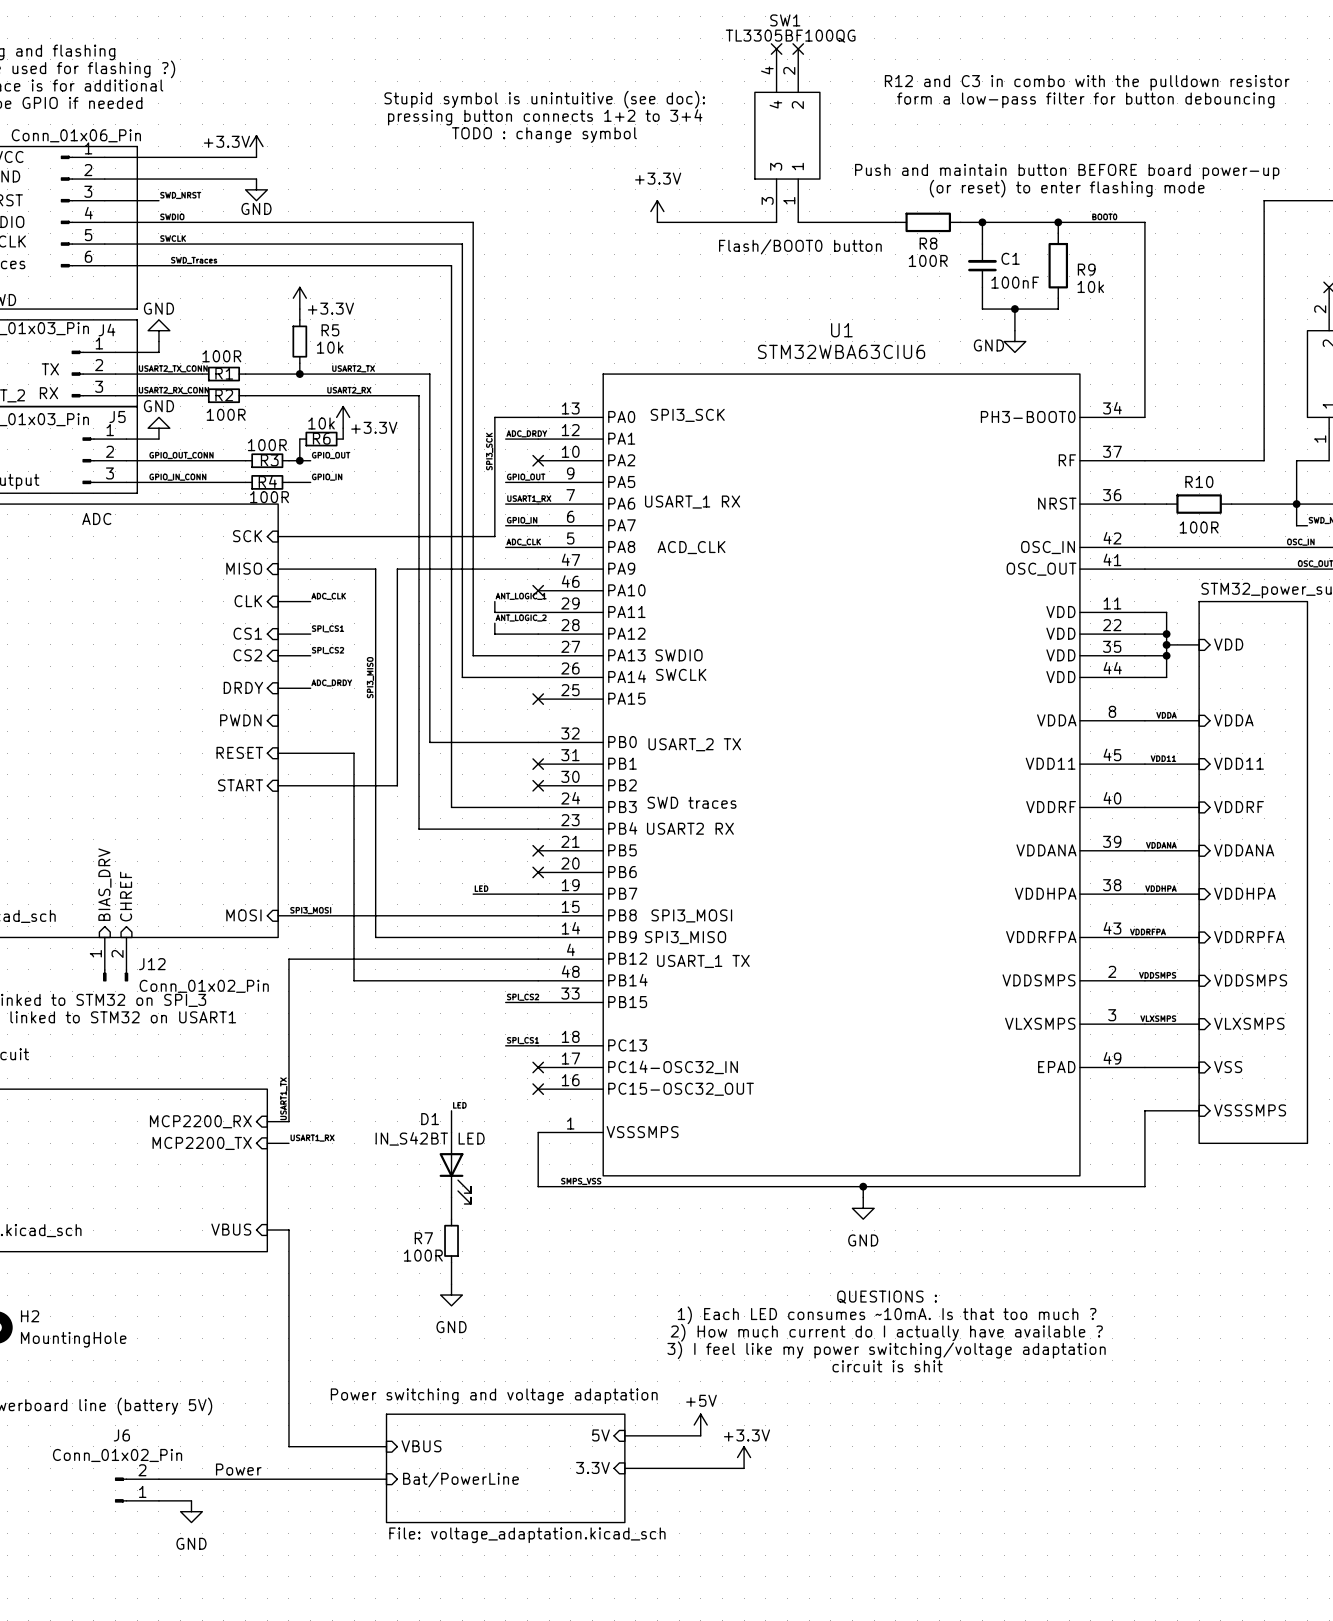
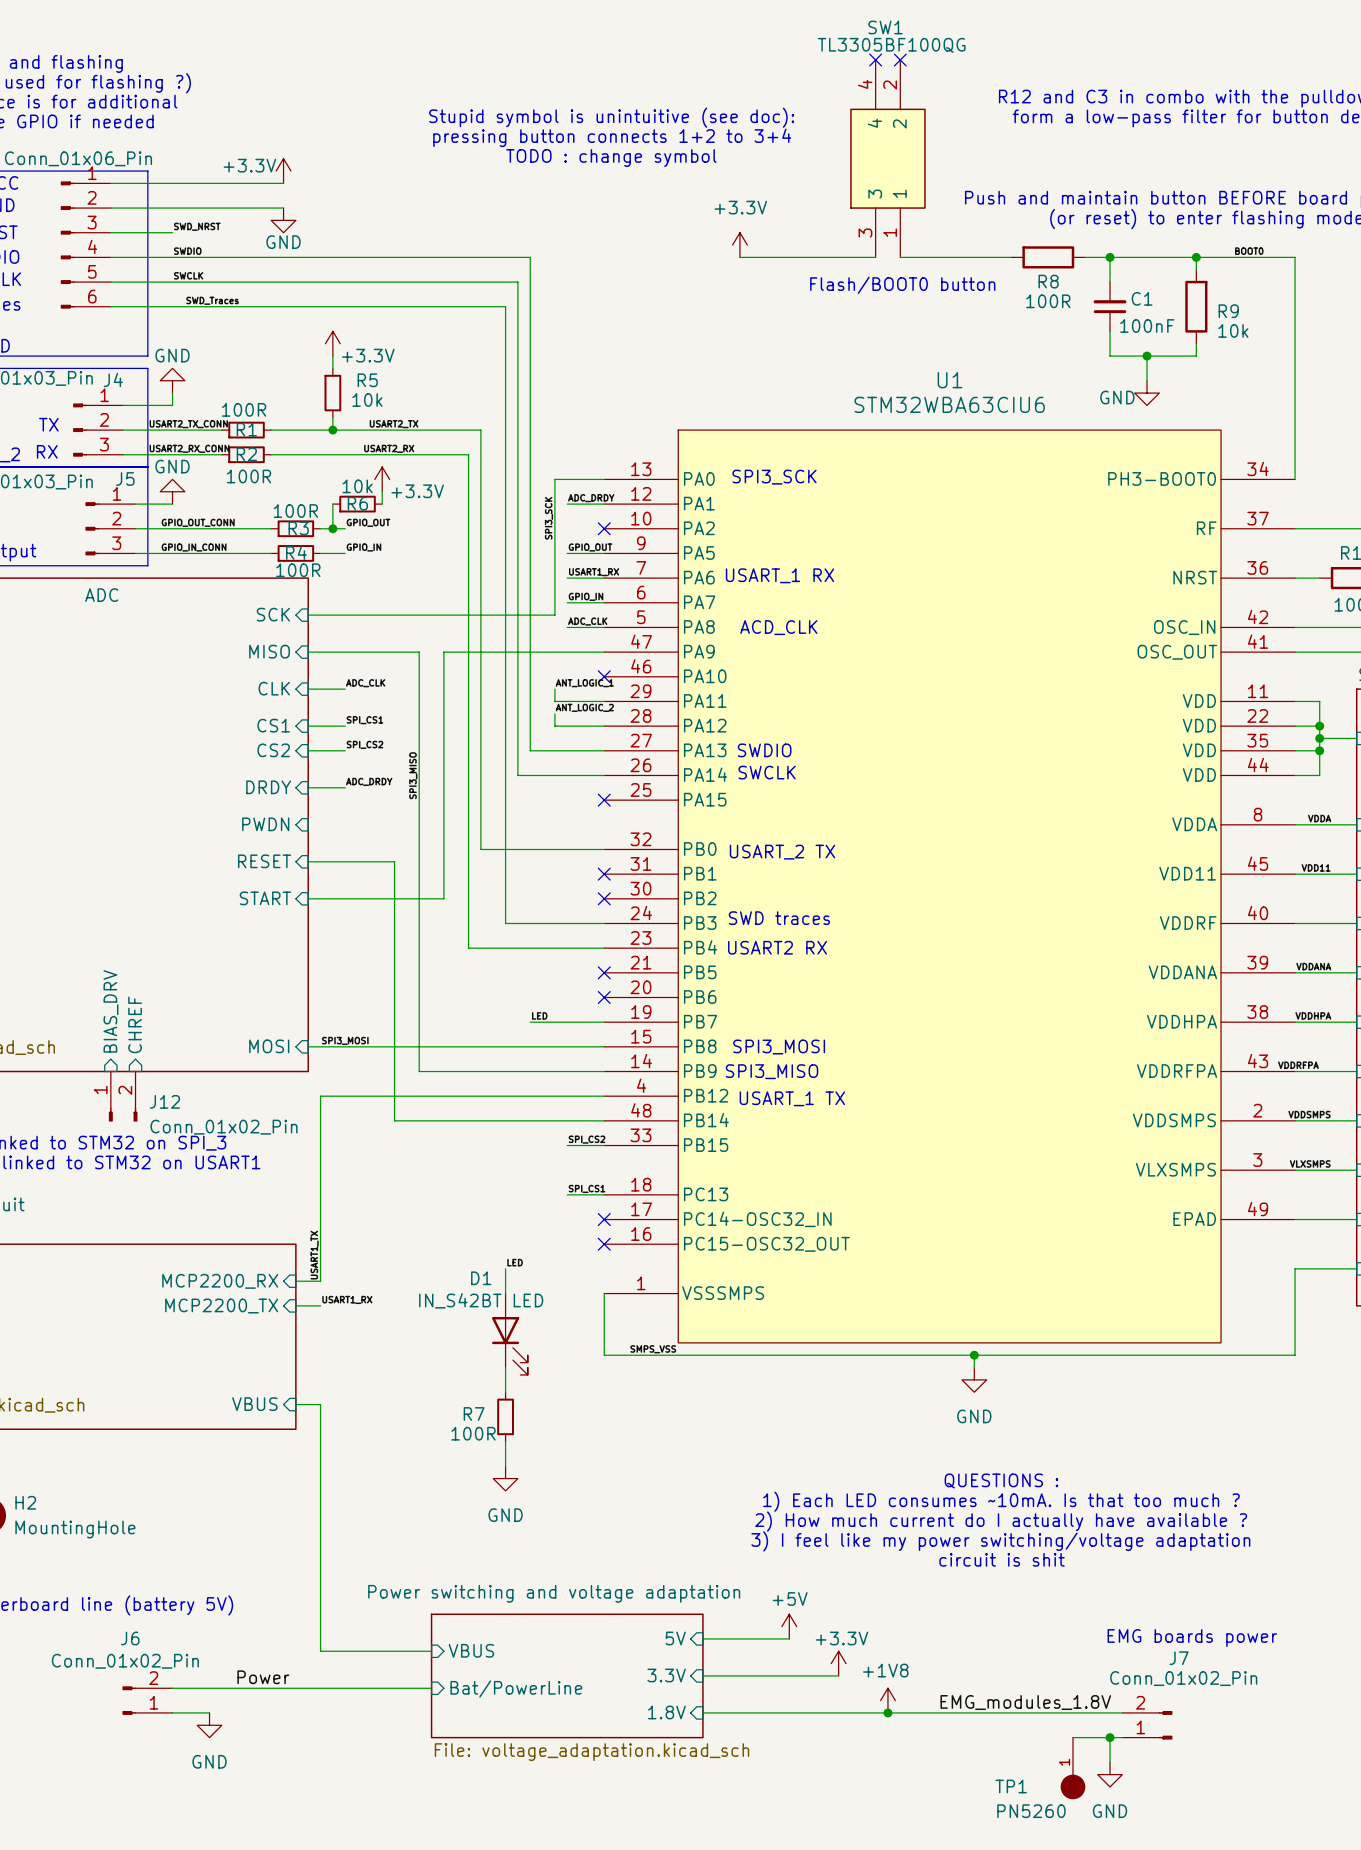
text: none -> EMG boards power (1192, 1638)
power symbol: none -> +1V8 (887, 1700)
label: none -> EMG_modules_1.8V (1025, 1702)
sheet pin: none -> 1.8V (666, 1712)
wire: none -> (702, 1712) (1122, 1712)
junction: none -> (887, 1712)
J7: none -> Conn_01x02_Pin (1147, 1725)
wire: none -> (1073, 1737) (1122, 1737)
wire: none -> (1110, 1737) (1110, 1762)
junction: none -> (1110, 1737)
TP1: none -> PN5260 (1073, 1768)
power symbol: none -> GND (1110, 1774)

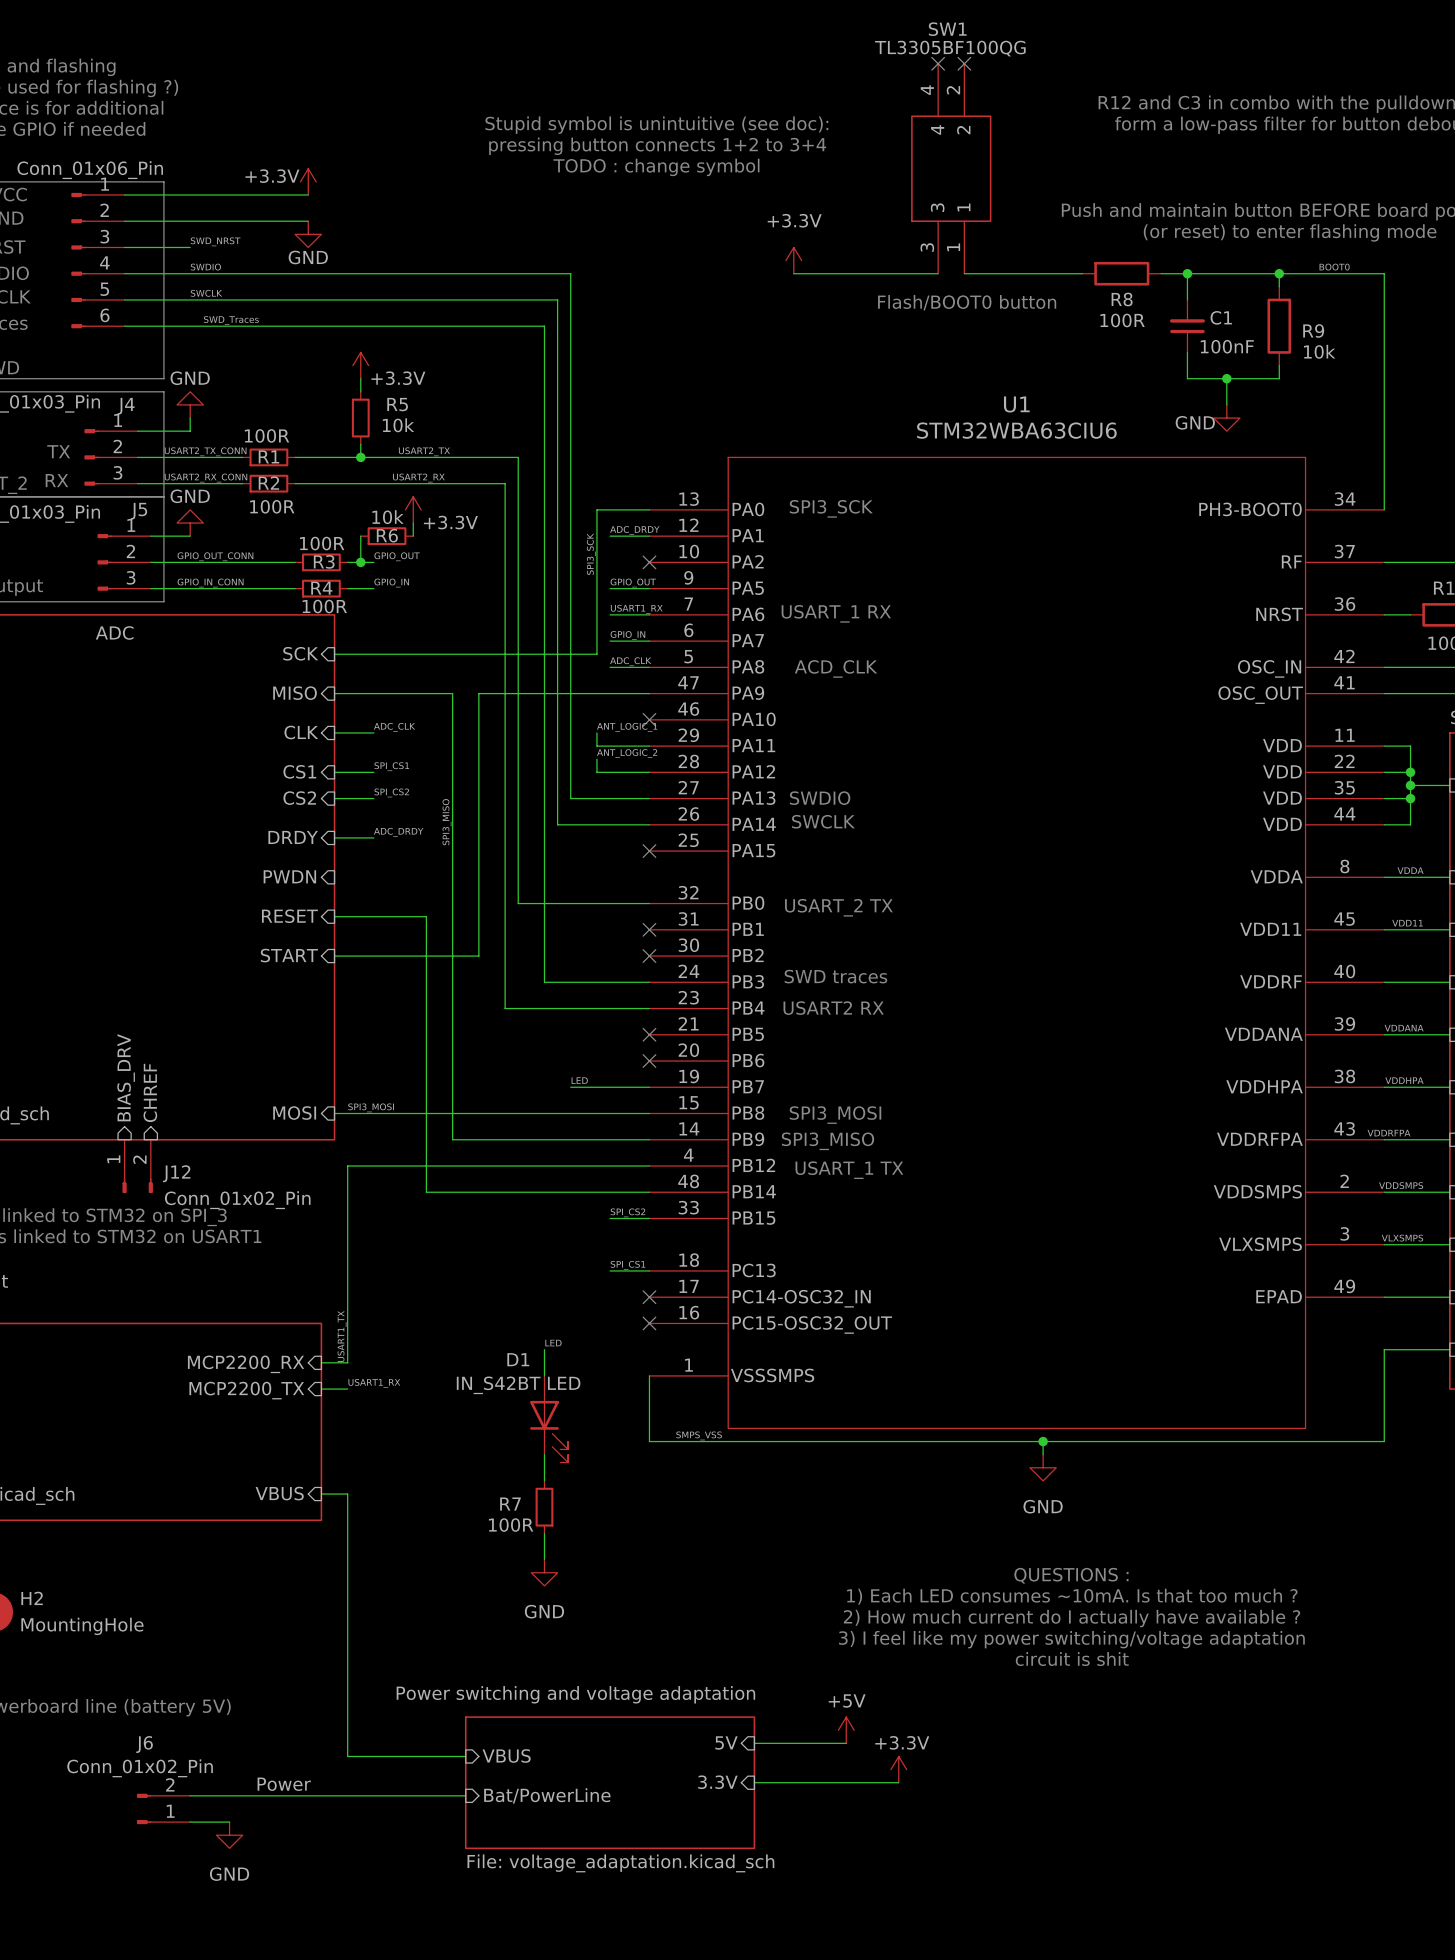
text: EMG boards power (1192, 1638) -> none
power symbol: +1V8 (887, 1700) -> none
label: EMG_modules_1.8V (1025, 1702) -> none
sheet pin: 1.8V (666, 1712) -> none
wire: (702, 1712) (1122, 1712) -> none
junction: (887, 1712) -> none
J7: Conn_01x02_Pin (1147, 1725) -> none
wire: (1073, 1737) (1122, 1737) -> none
wire: (1110, 1737) (1110, 1762) -> none
junction: (1110, 1737) -> none
TP1: PN5260 (1073, 1768) -> none
power symbol: GND (1110, 1774) -> none

